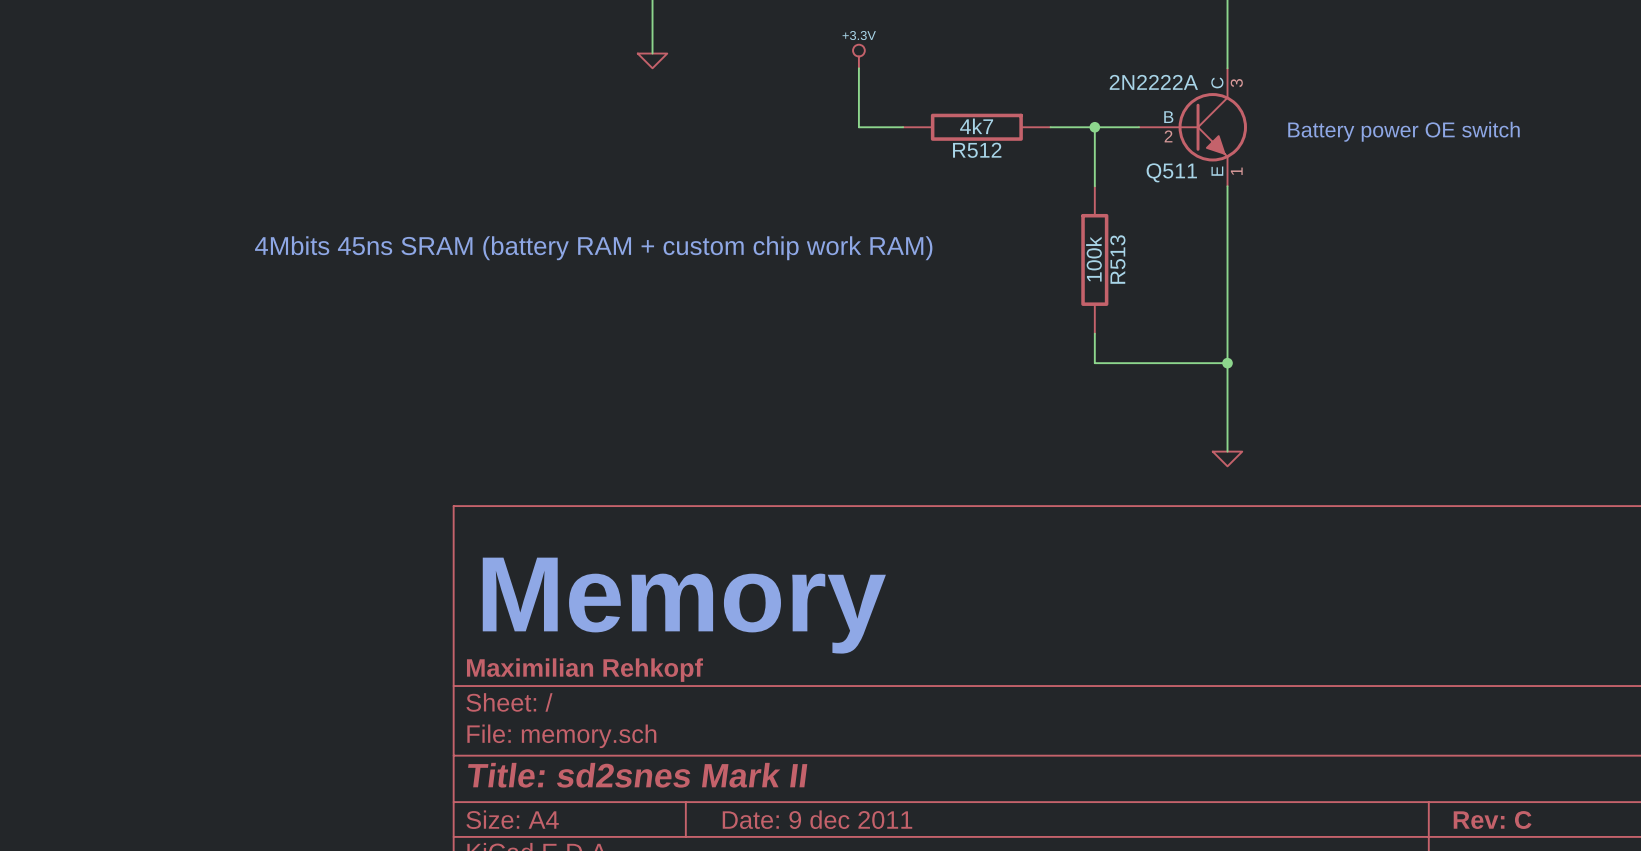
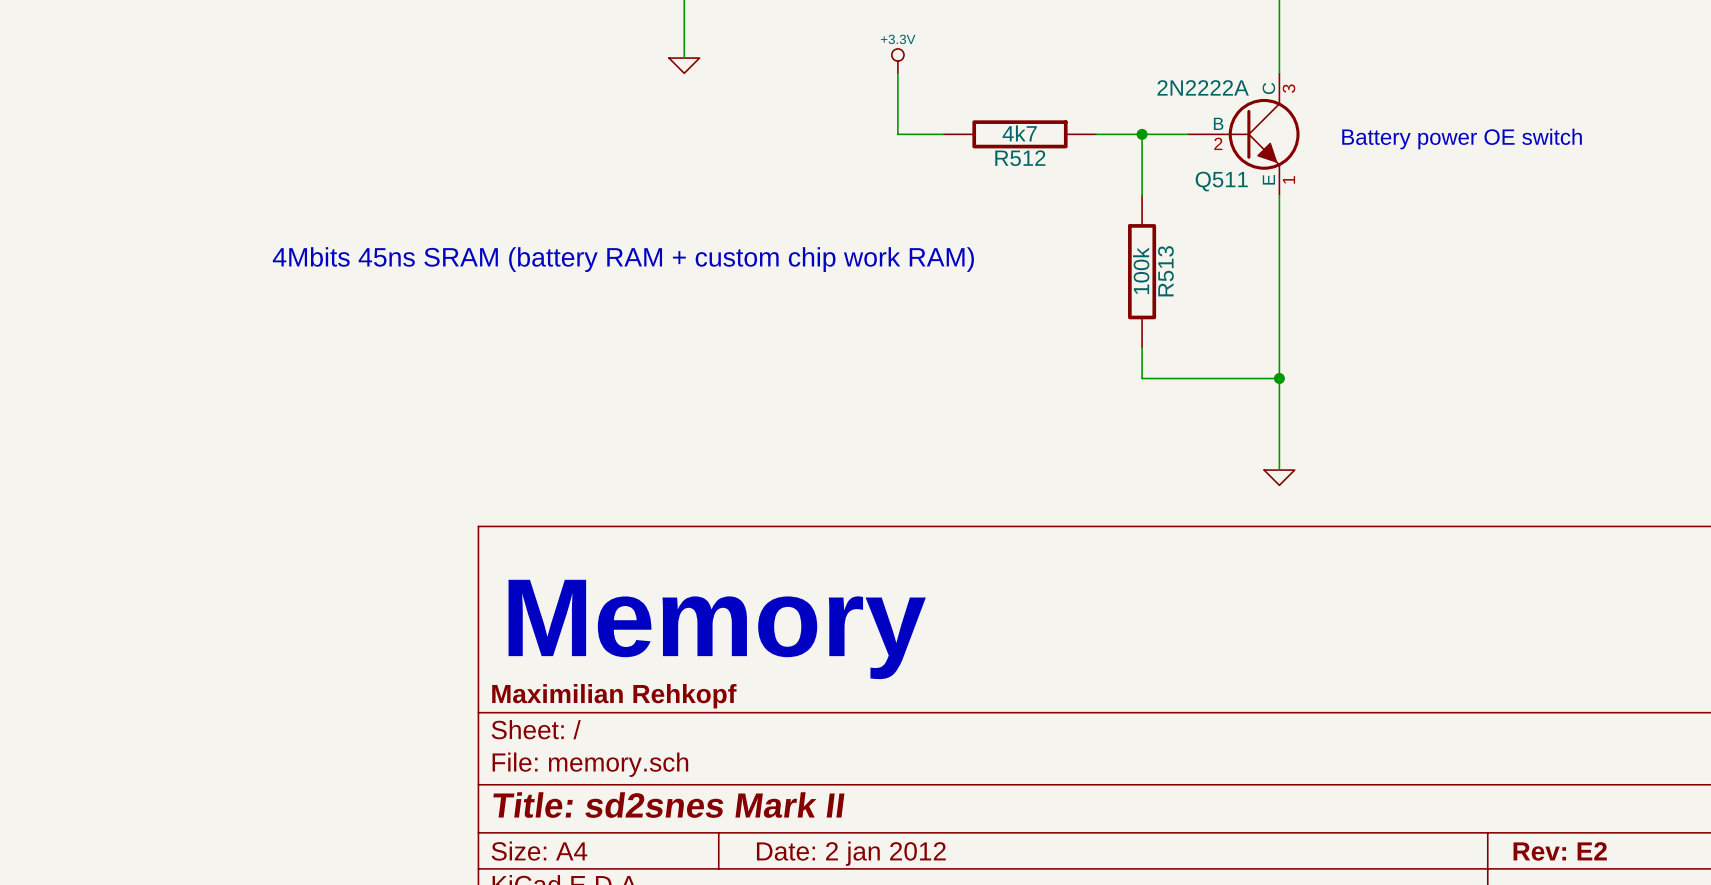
title block: Date: 9 dec 2011 (817, 819) -> Date: 2 jan 2012 (851, 853)
title block: Rev: C (1492, 820) -> Rev: E2 (1560, 851)

